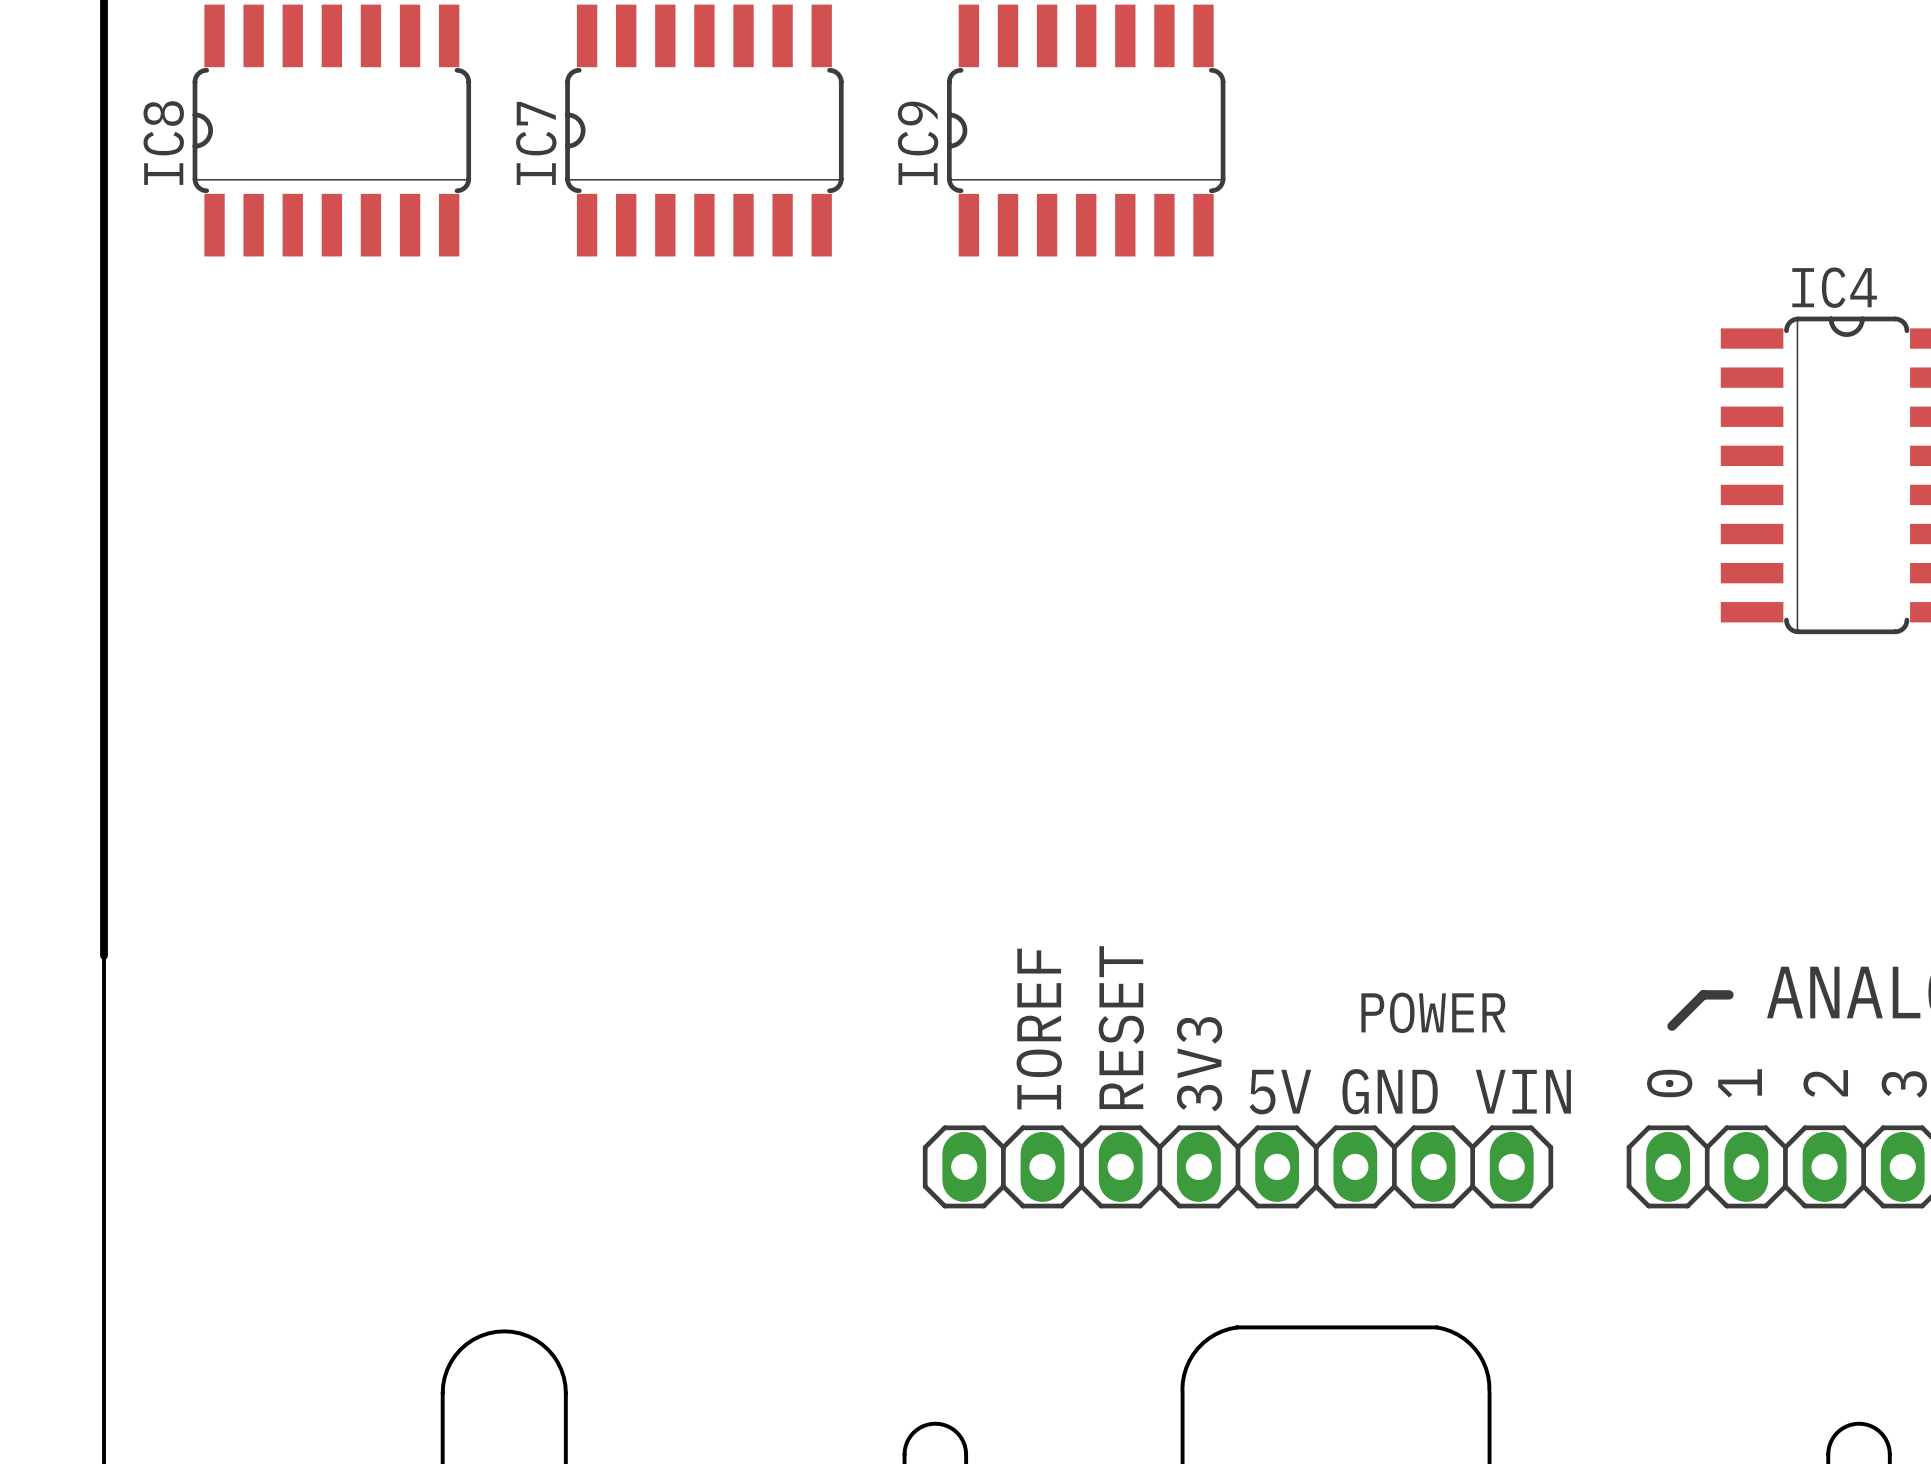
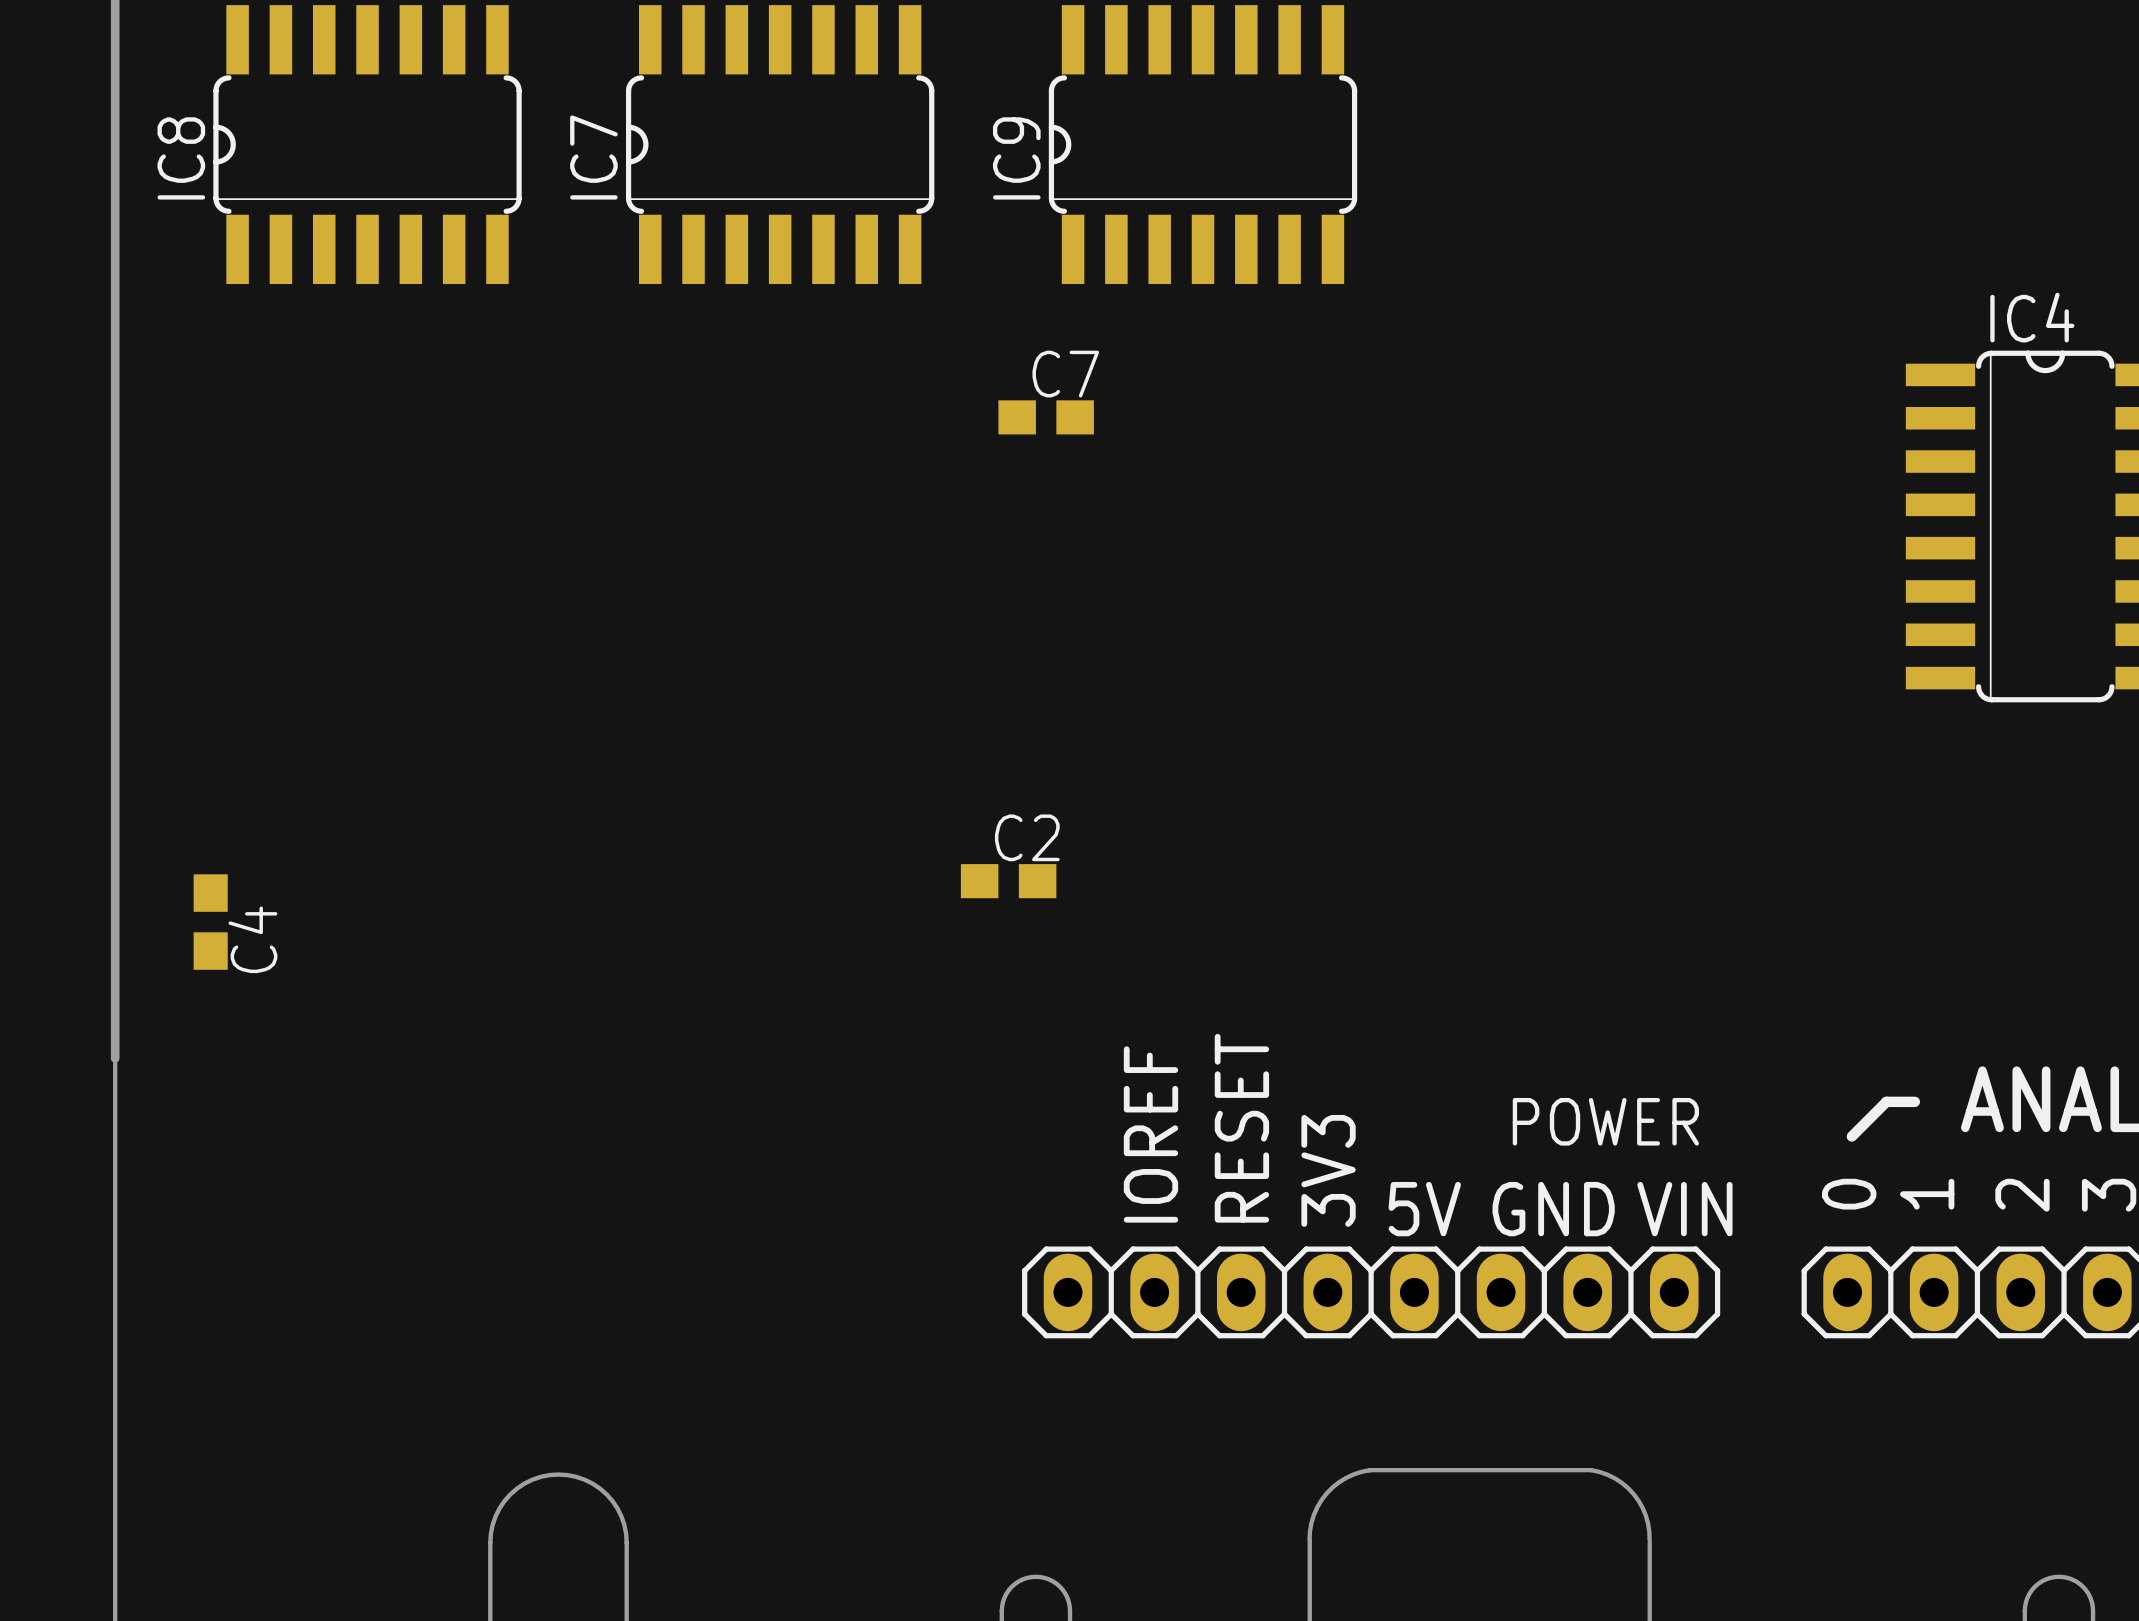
C7: none -> (1046, 417)
C2: none -> (1008, 881)
C4: none -> (210, 922)

